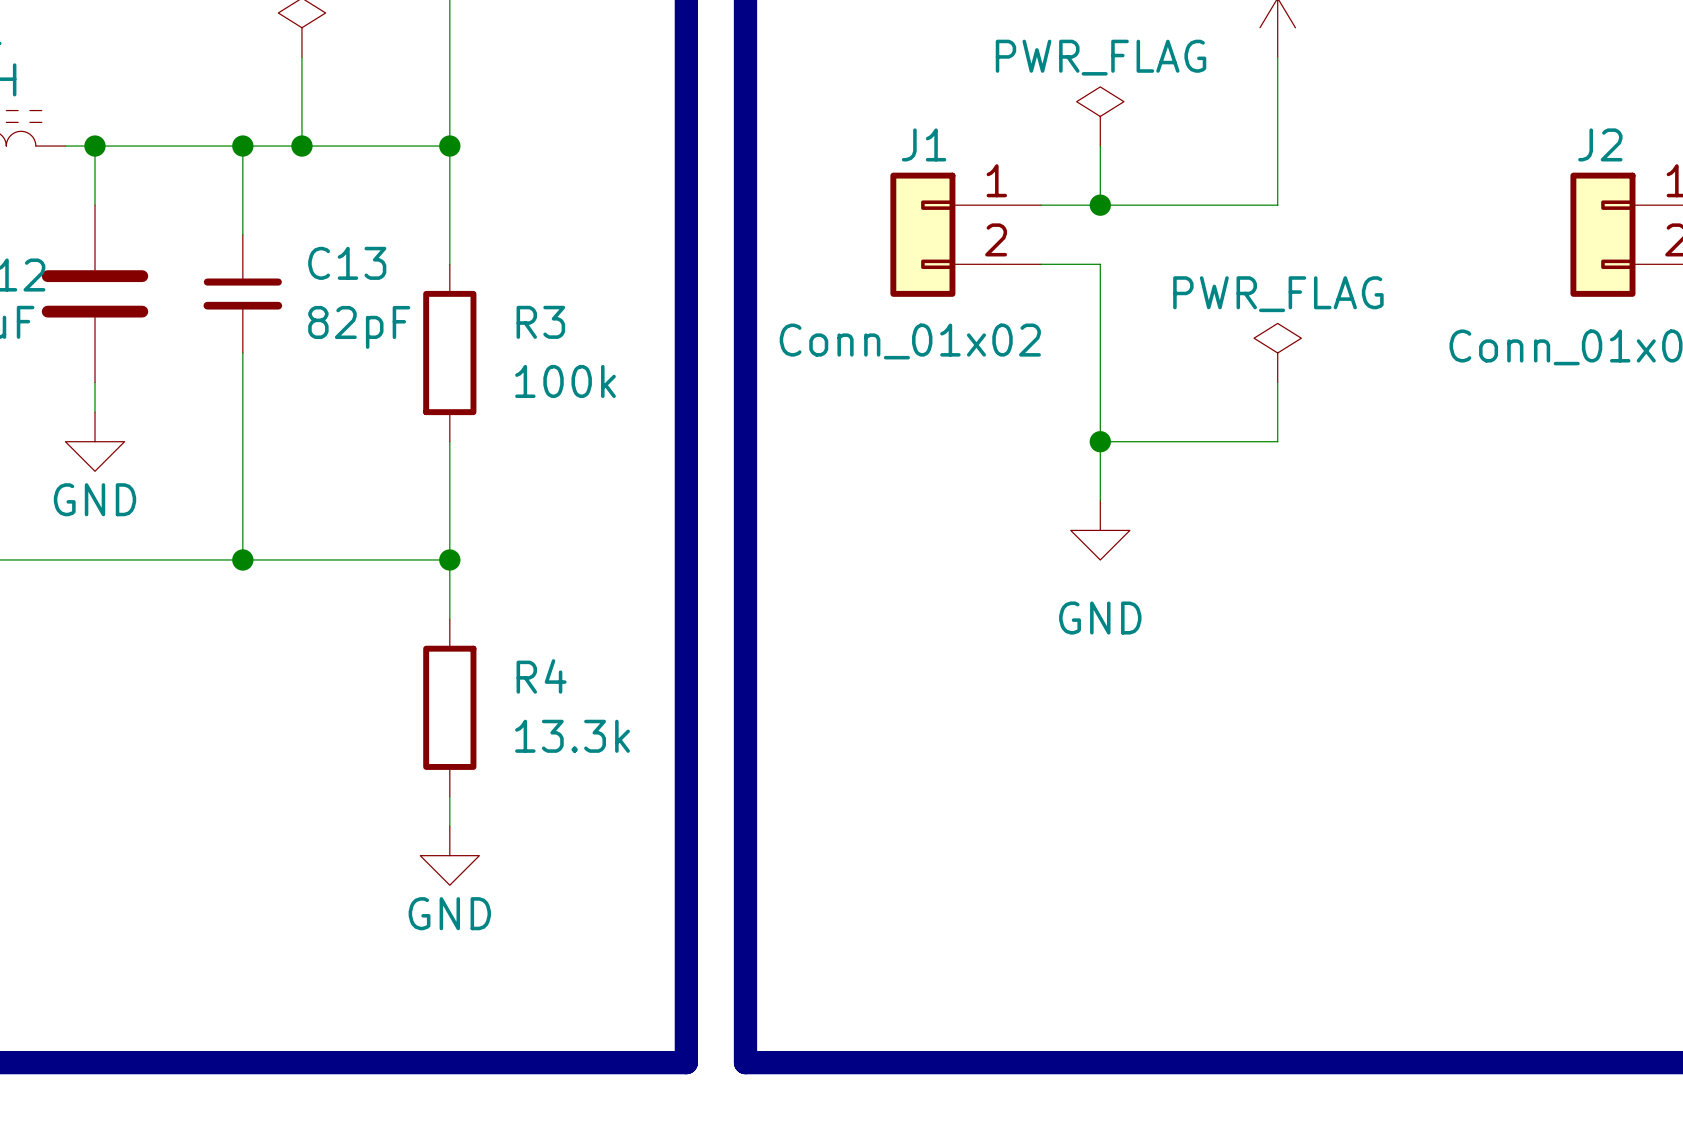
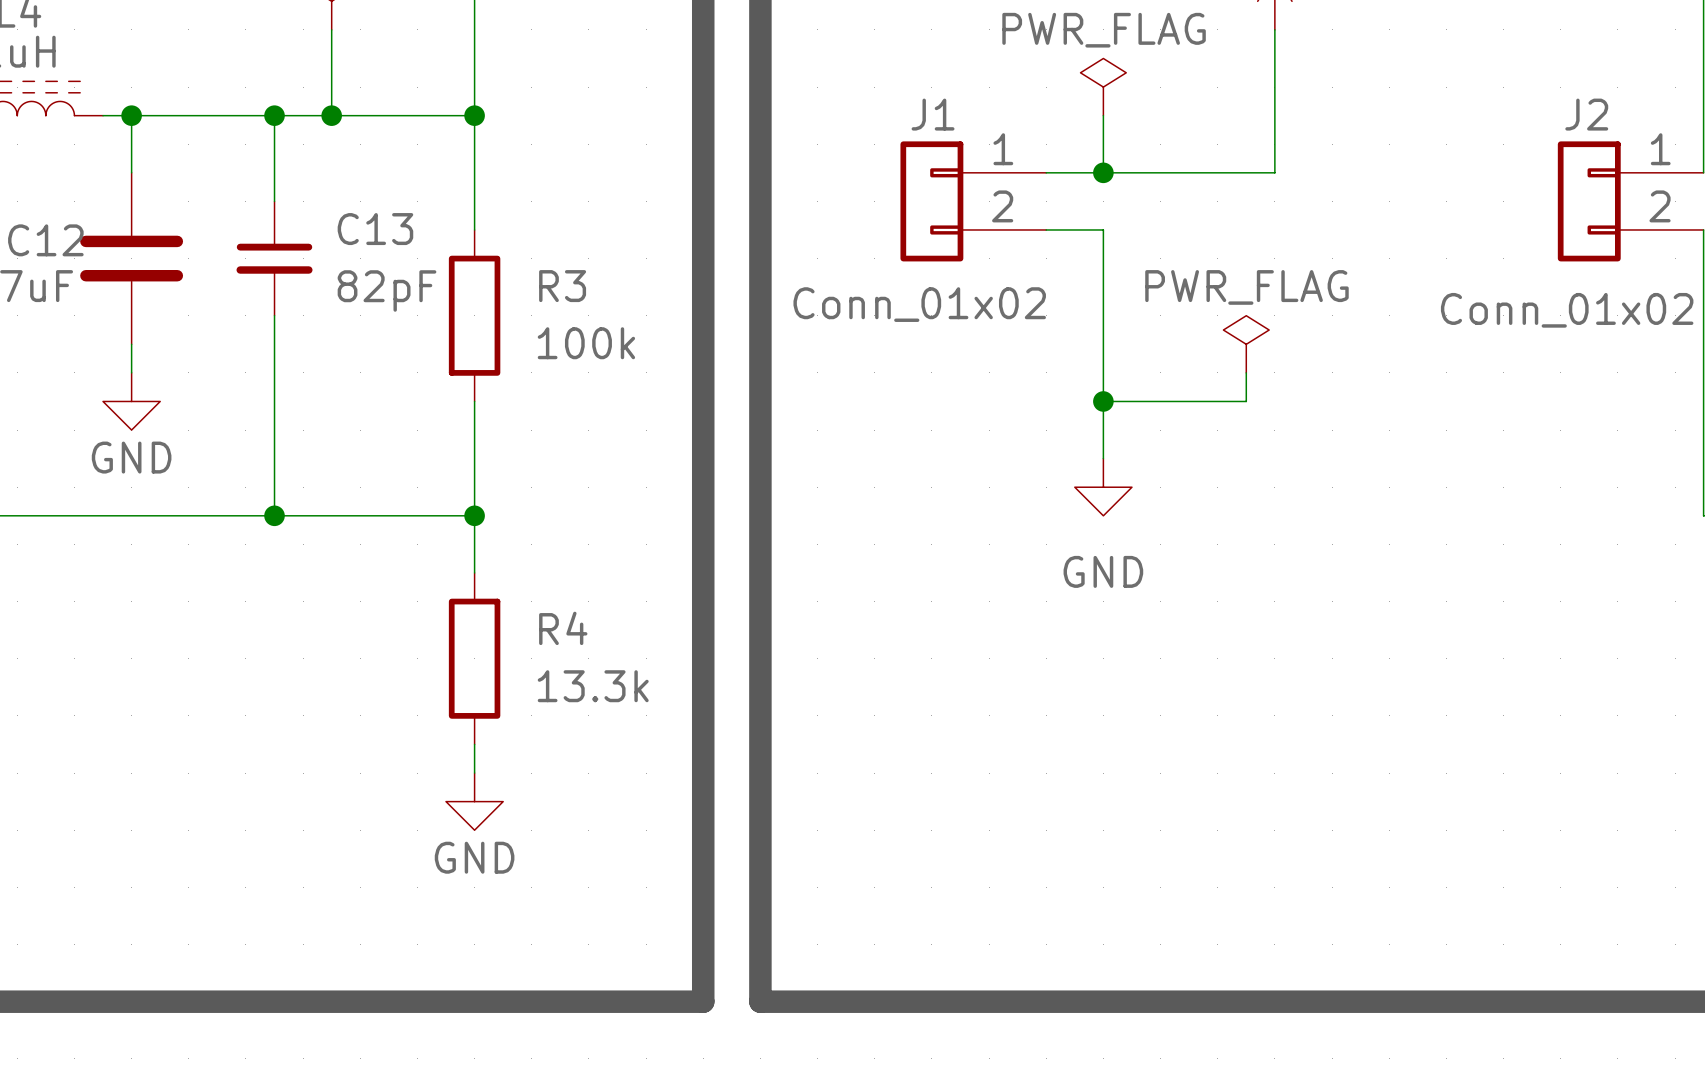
power symbol position: PWR_FLAG (1277, 353) -> PWR_FLAG (1246, 344)
wire: (1277, 382) (1277, 441) (1248, 441) -> (1246, 372) (1246, 401)

